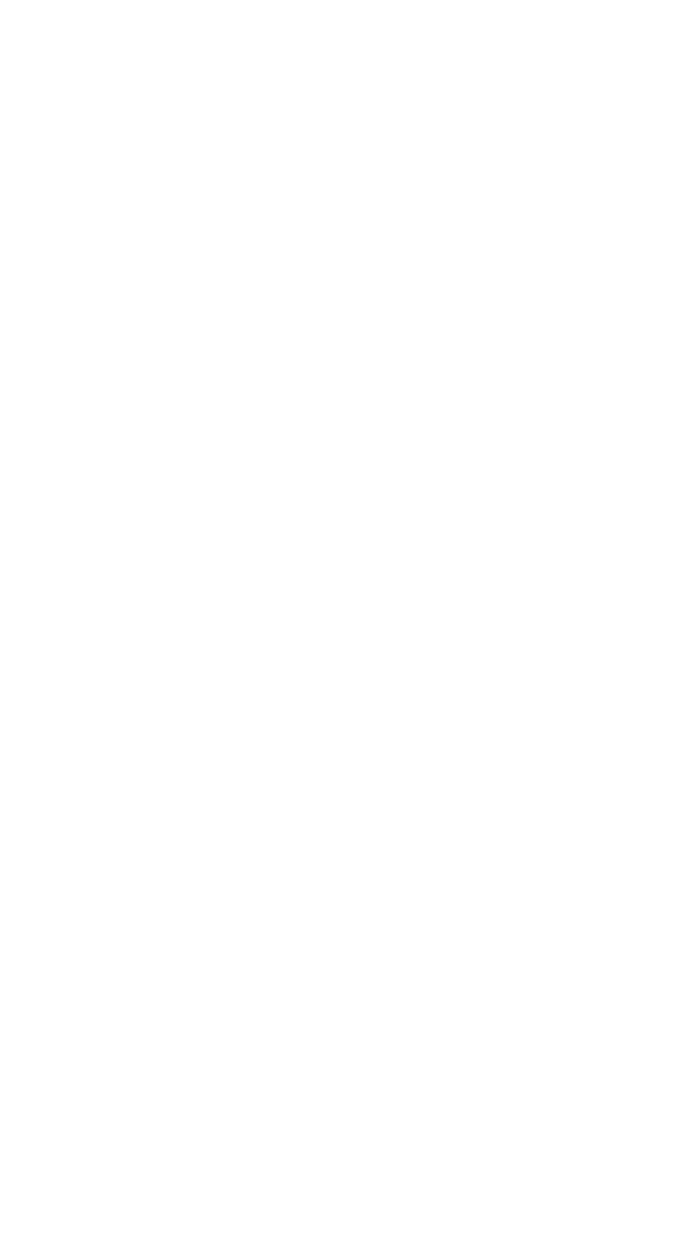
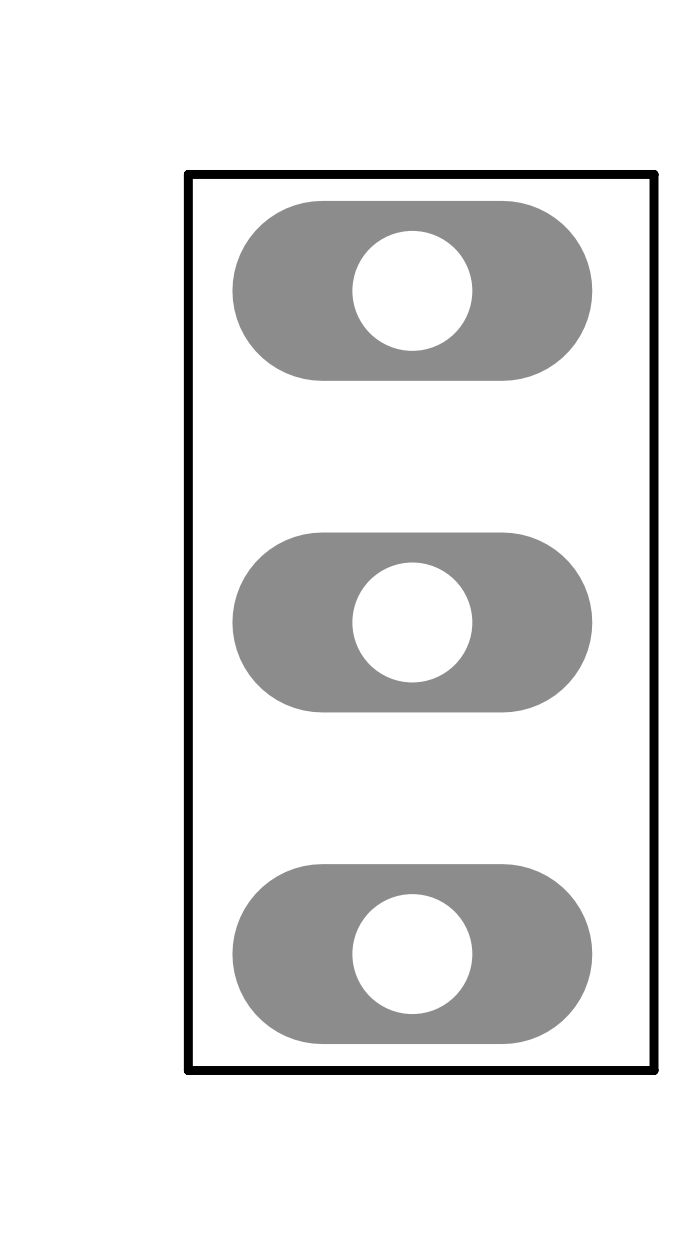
part: none -> (421, 622)

